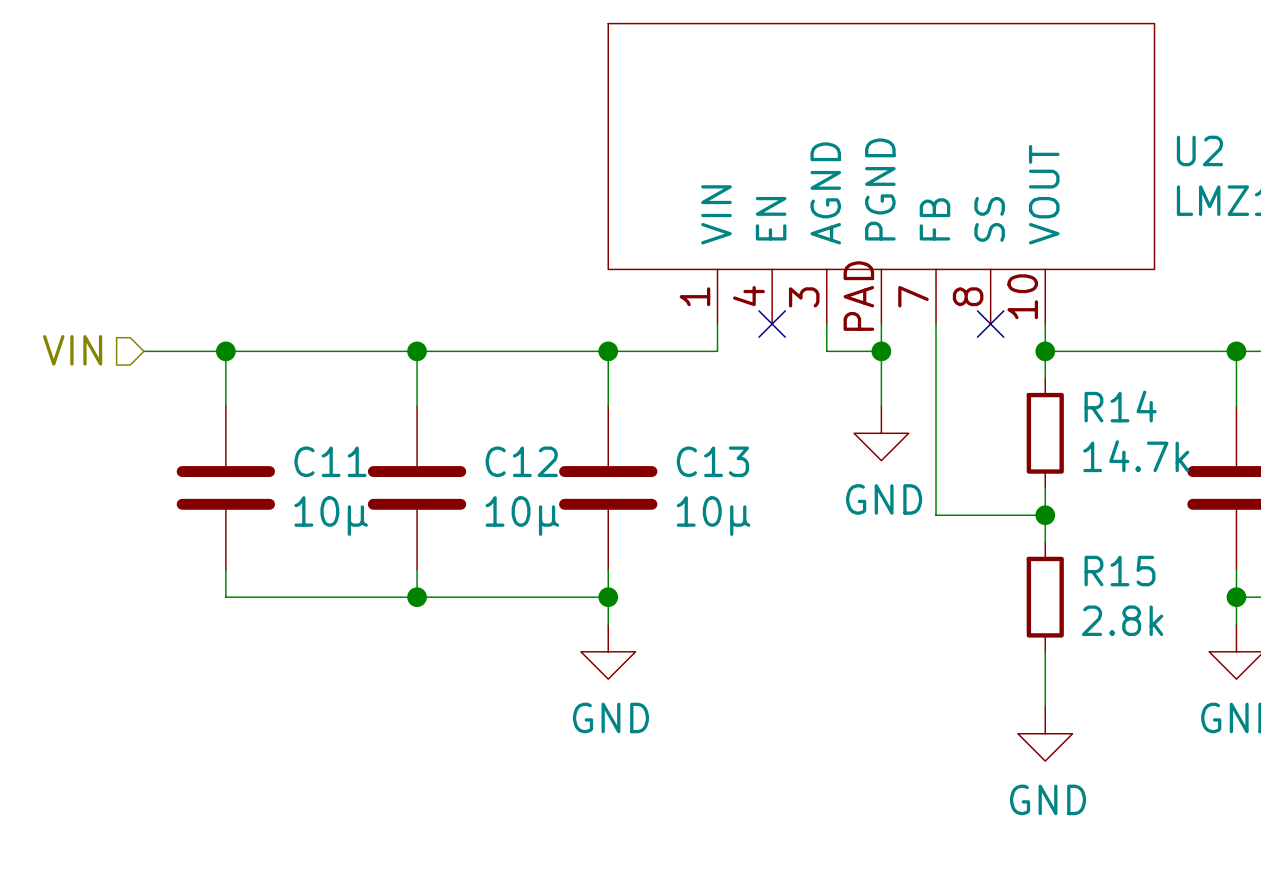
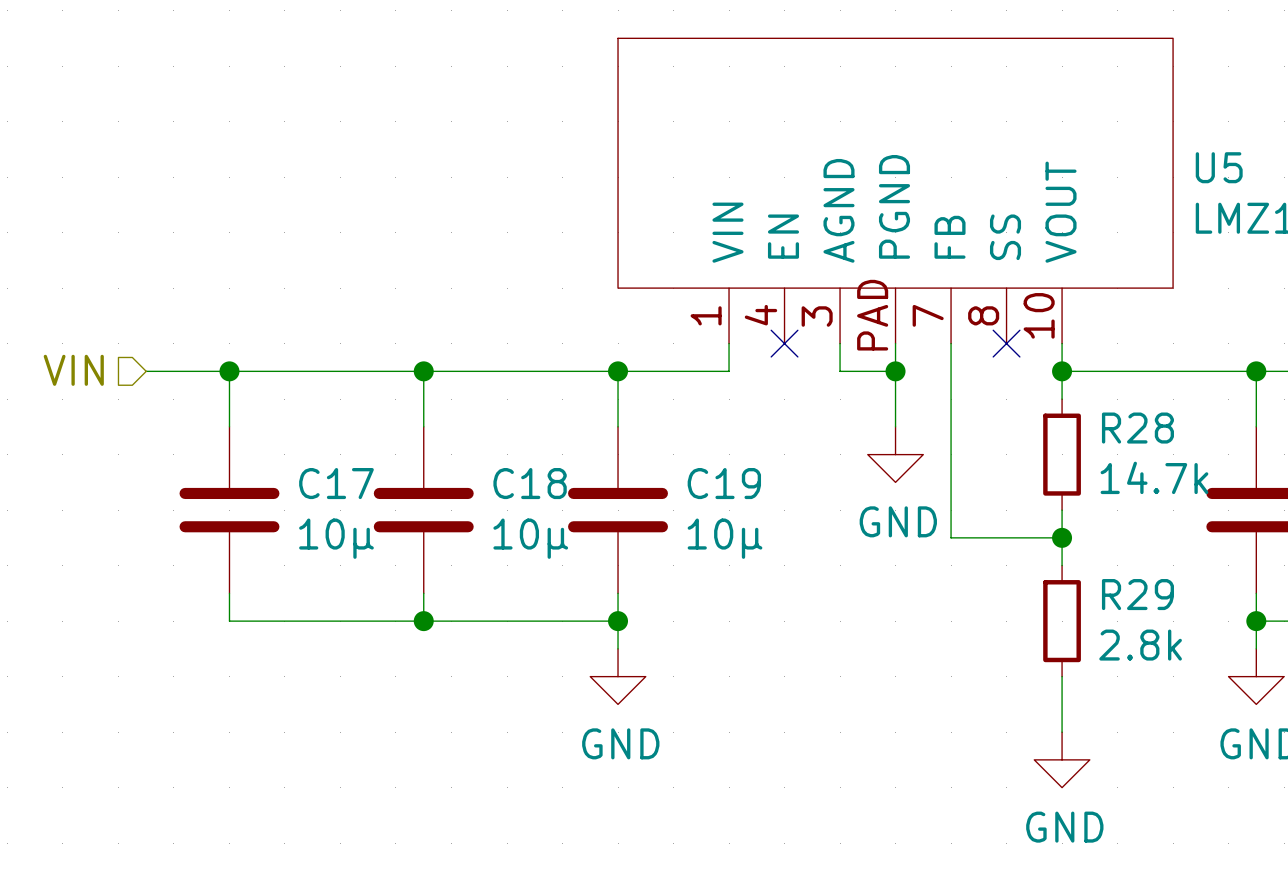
U2 name: U2 (1199, 150) -> U5 (1219, 167)
R14 name: R14 (1120, 406) -> R28 (1137, 428)
C11 name: C11 (330, 461) -> C17 (336, 483)
C12 name: C12 (521, 461) -> C18 (530, 483)
C13 name: C13 (712, 461) -> C19 (724, 483)
R15 name: R15 (1119, 571) -> R29 (1137, 594)

